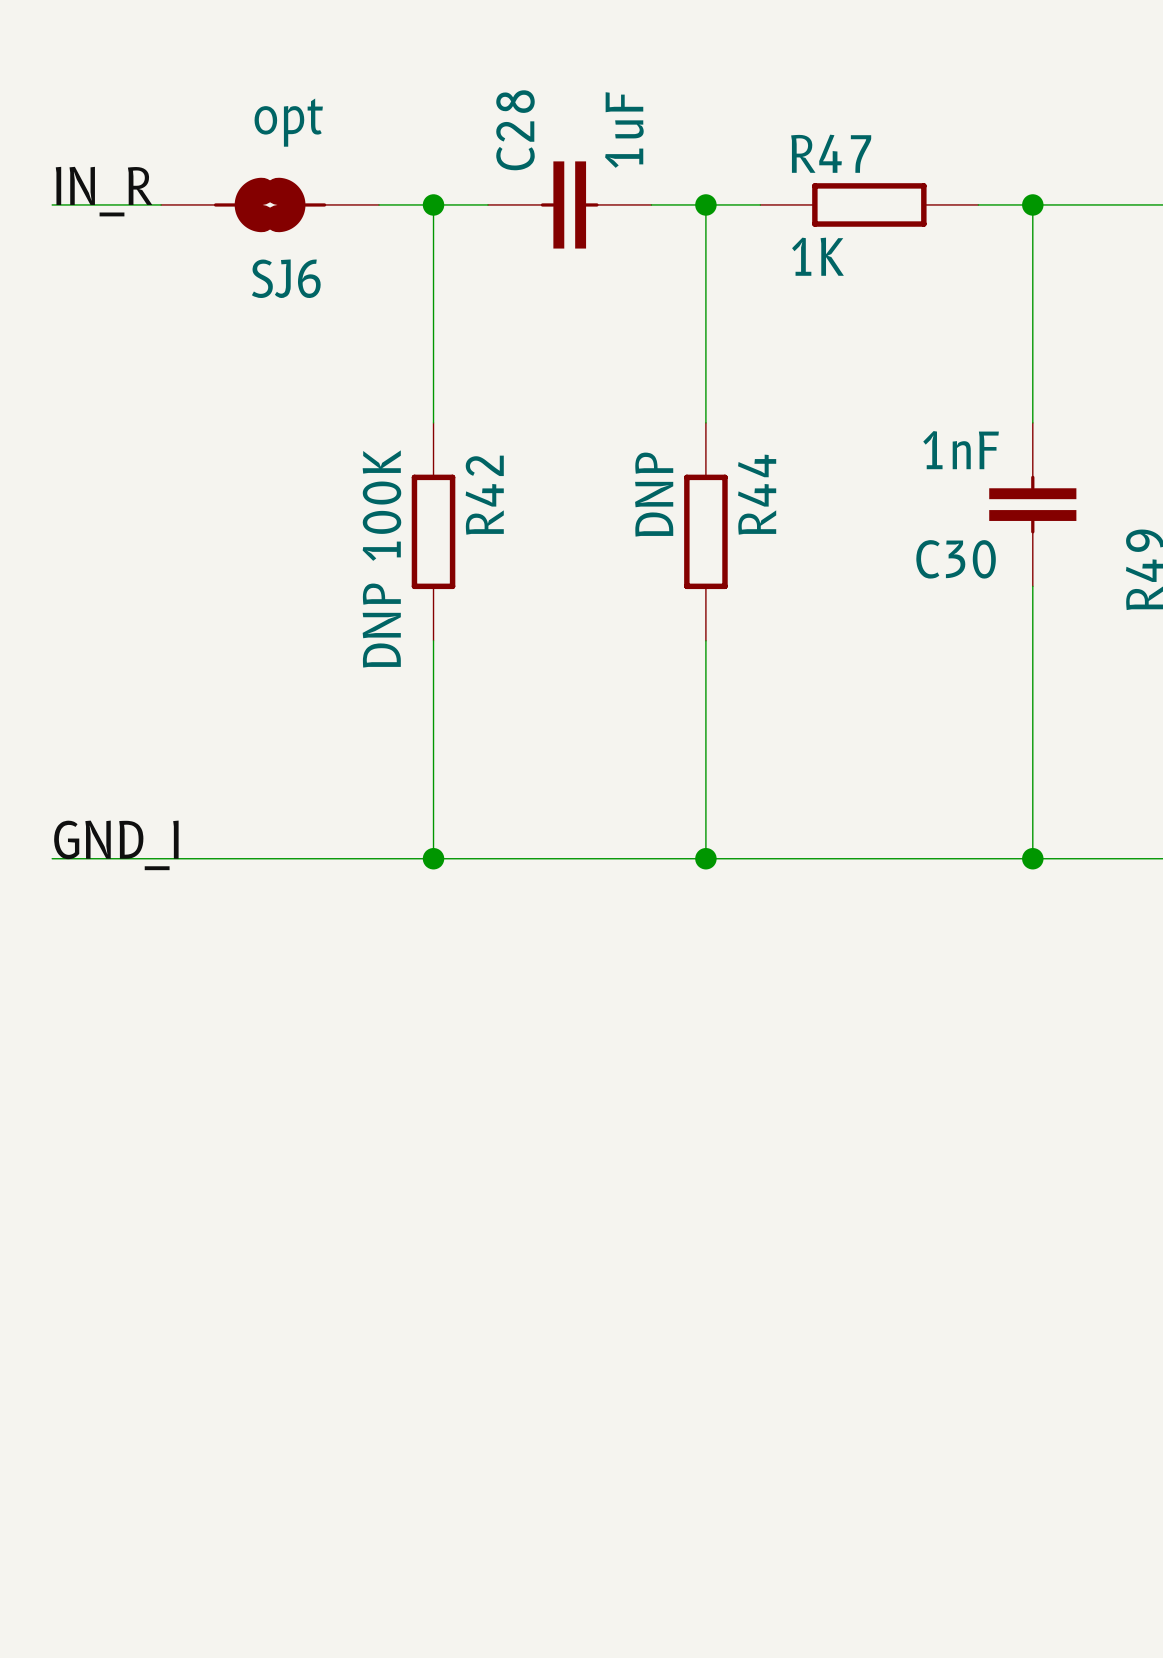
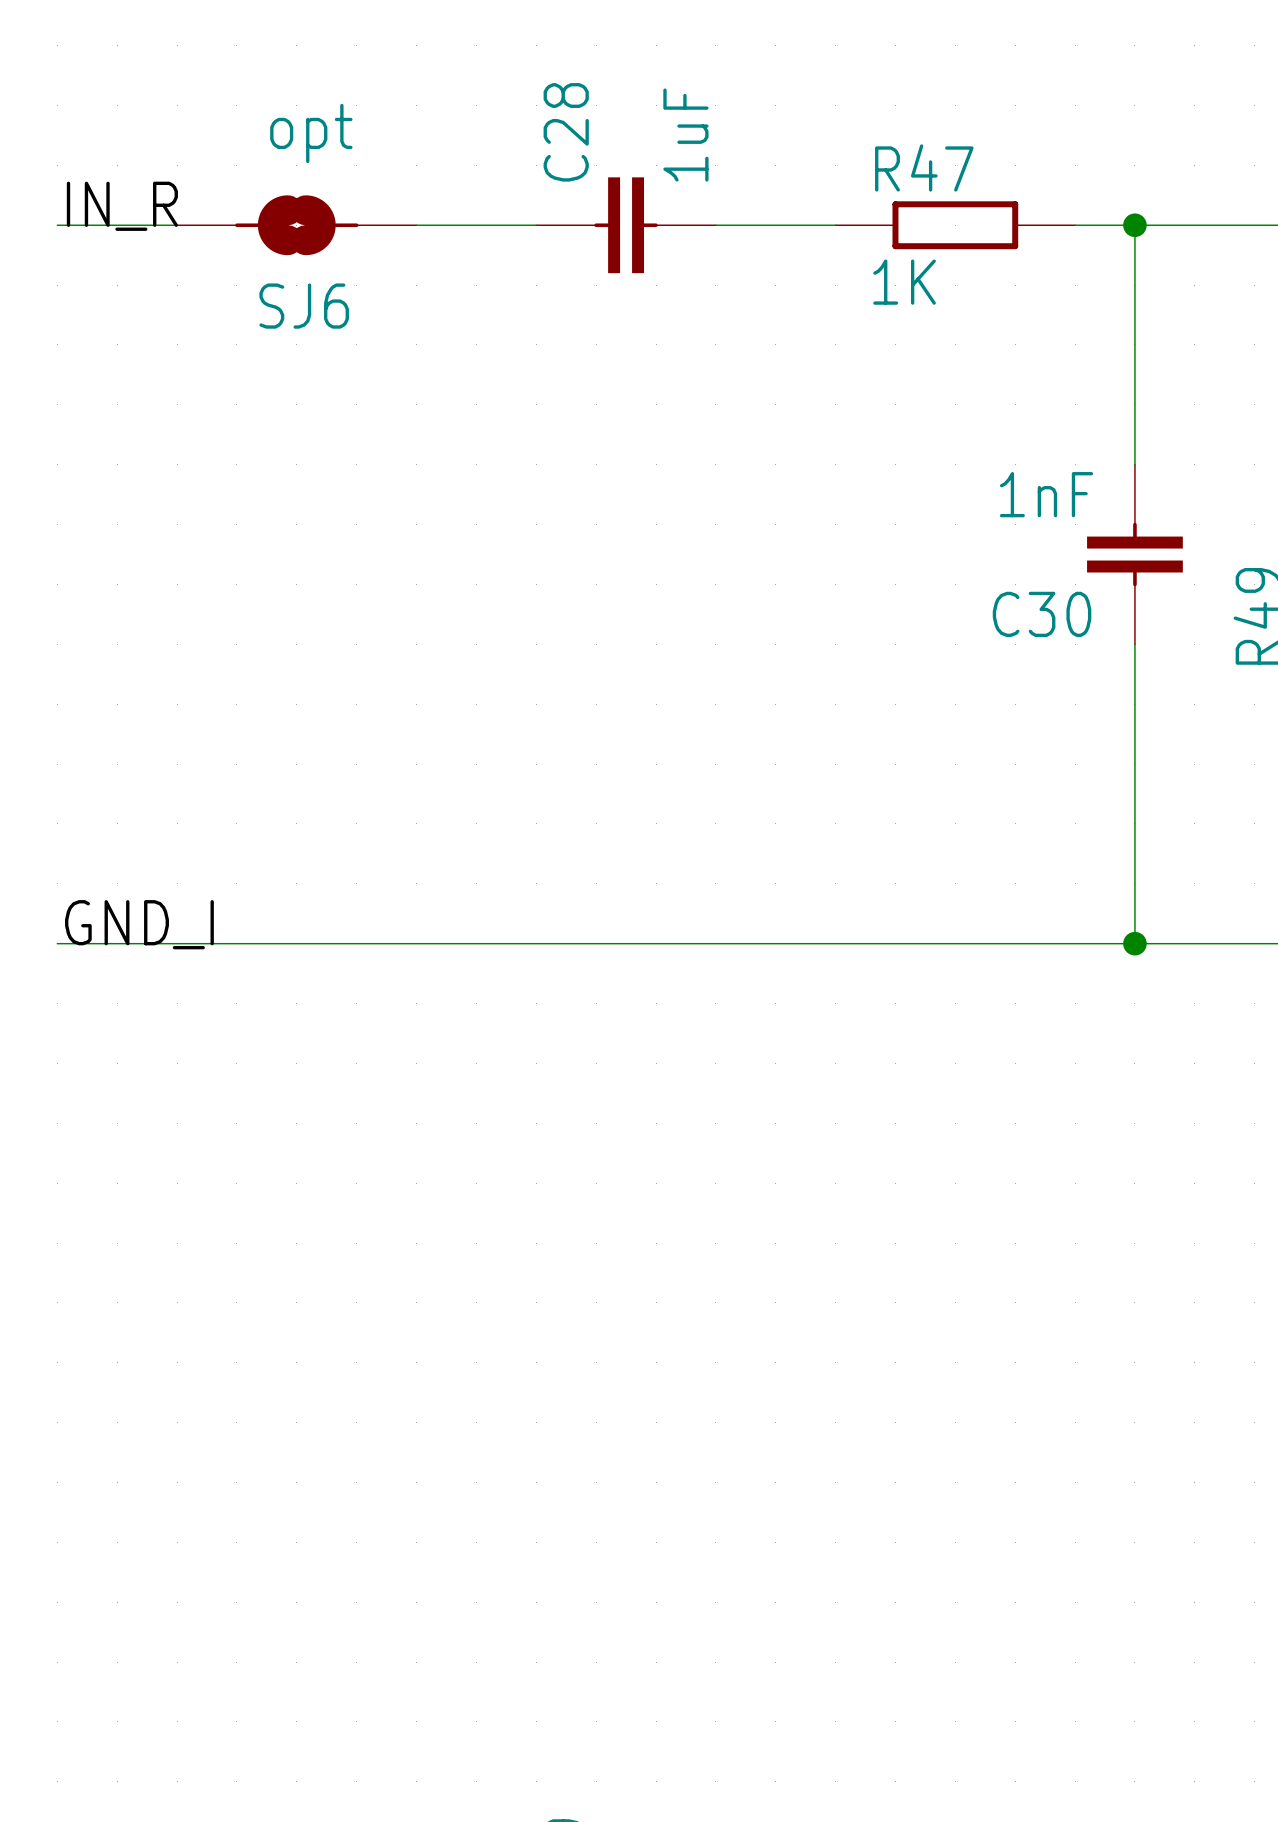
wire: (433, 204) (433, 422) -> none
junction: (433, 204) -> none
wire: (705, 204) (705, 422) -> none
junction: (705, 204) -> none
R42: DNP 100K (433, 531) -> none
R44: DNP (705, 531) -> none
wire: (433, 640) (433, 858) -> none
wire: (705, 640) (705, 858) -> none
junction: (433, 858) -> none
junction: (705, 858) -> none

